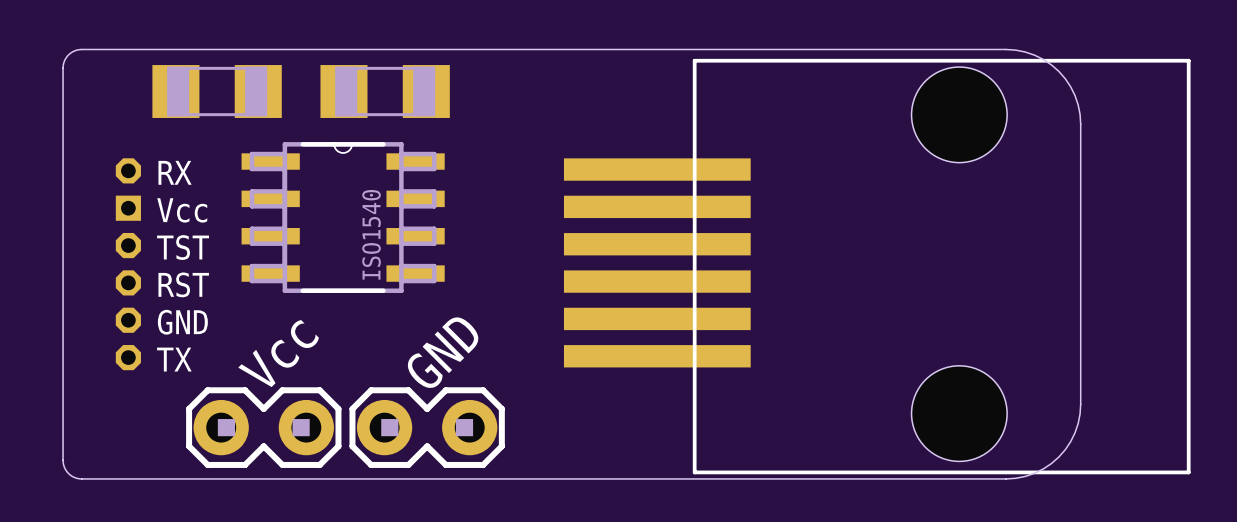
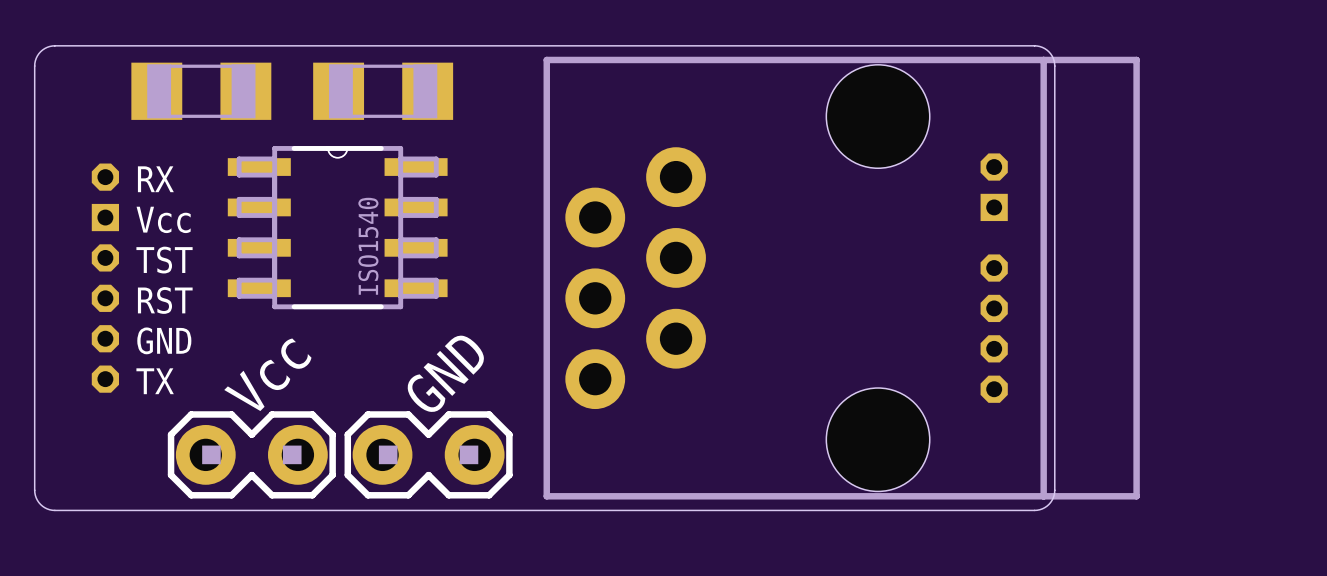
board edge: (987, 49) (1025, 52) (1051, 64) (1065, 78) (1075, 95) (1080, 124) (1080, 404) (1078, 423) (1065, 449) (1043, 468) (1015, 478) (987, 478) -> (1034, 45) (1042, 47) (1048, 51) (1053, 58) (1054, 66) (1054, 490) (1053, 497) (1048, 504) (1042, 508) (1034, 510)
part: none -> (841, 278)
part: none -> (994, 278)
part: (877, 266) -> none

